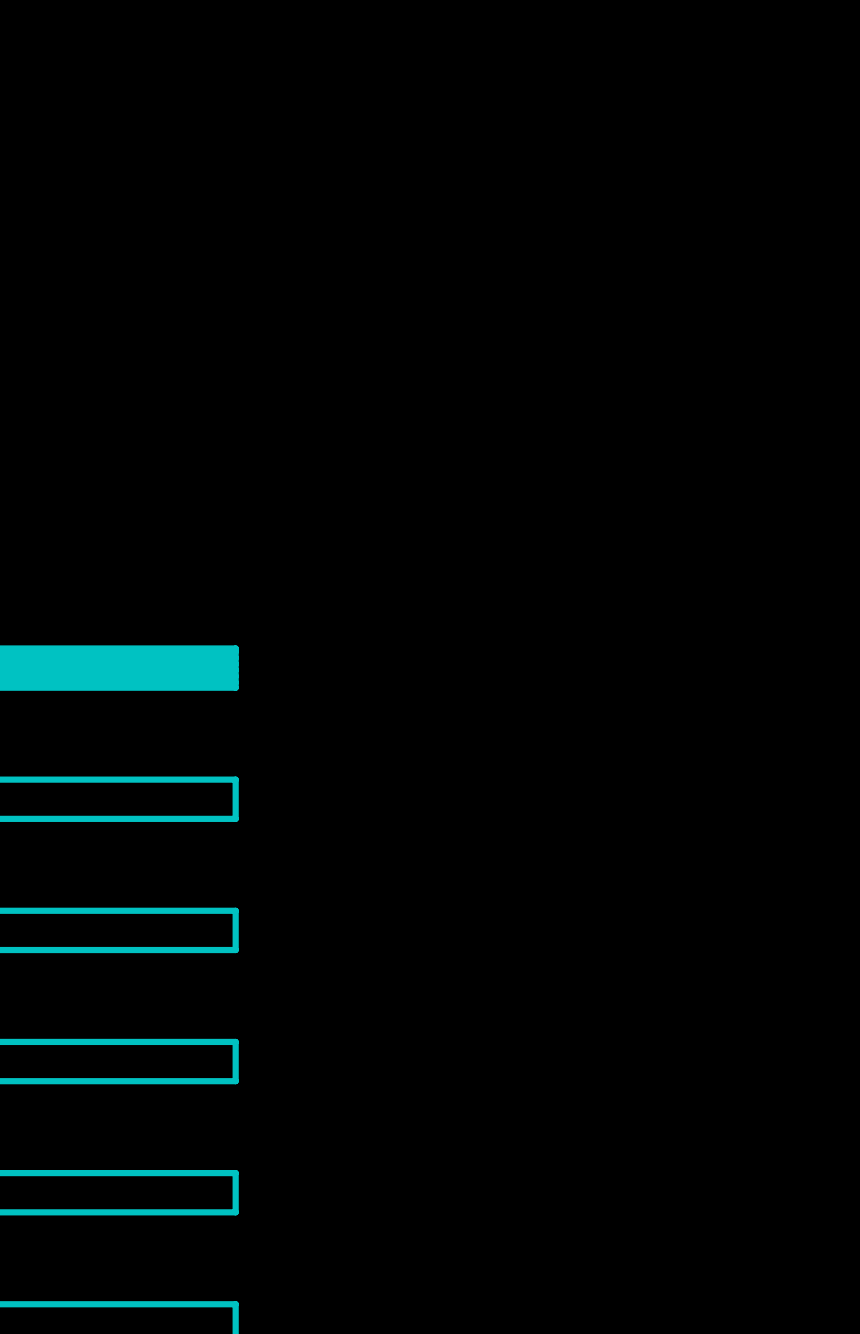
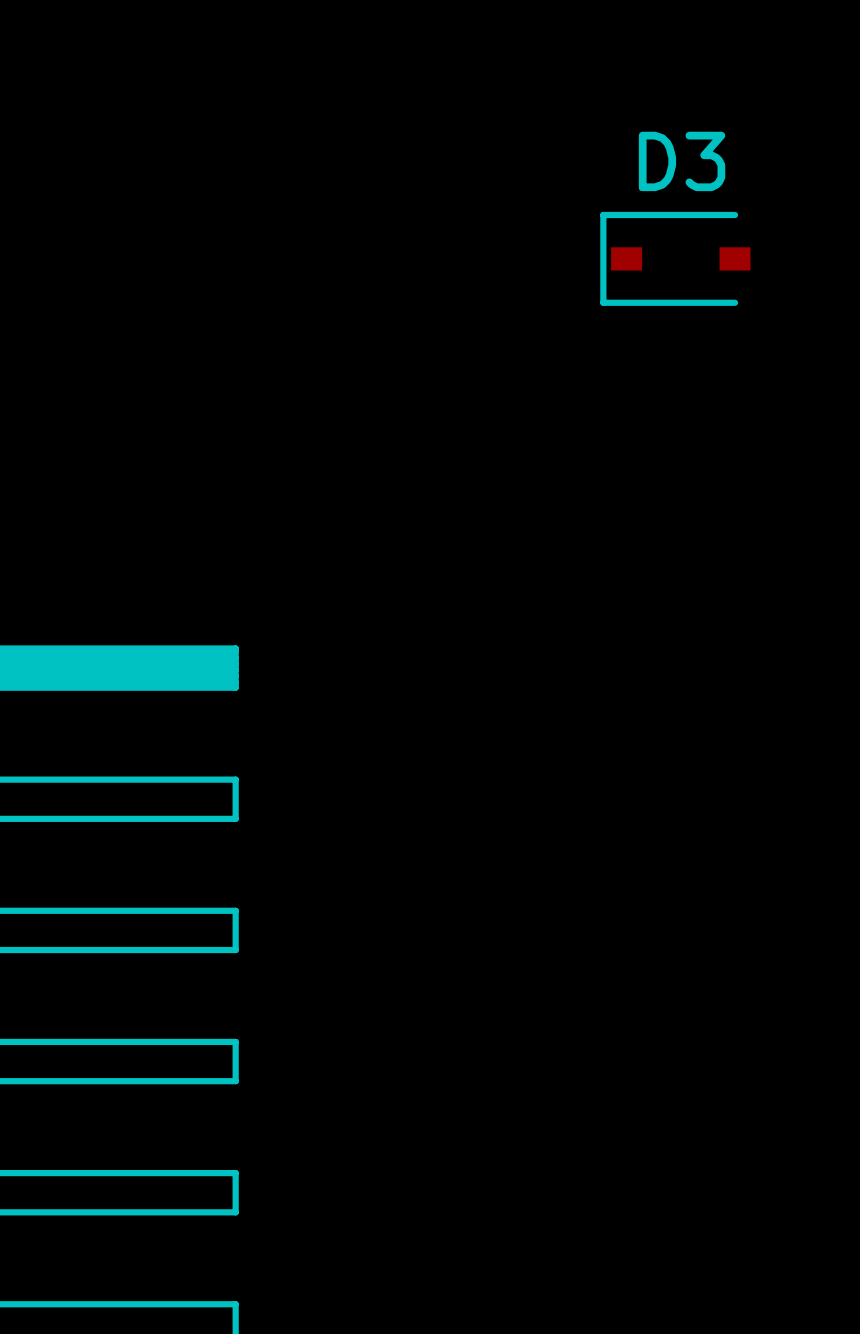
D3: none -> (675, 258)

